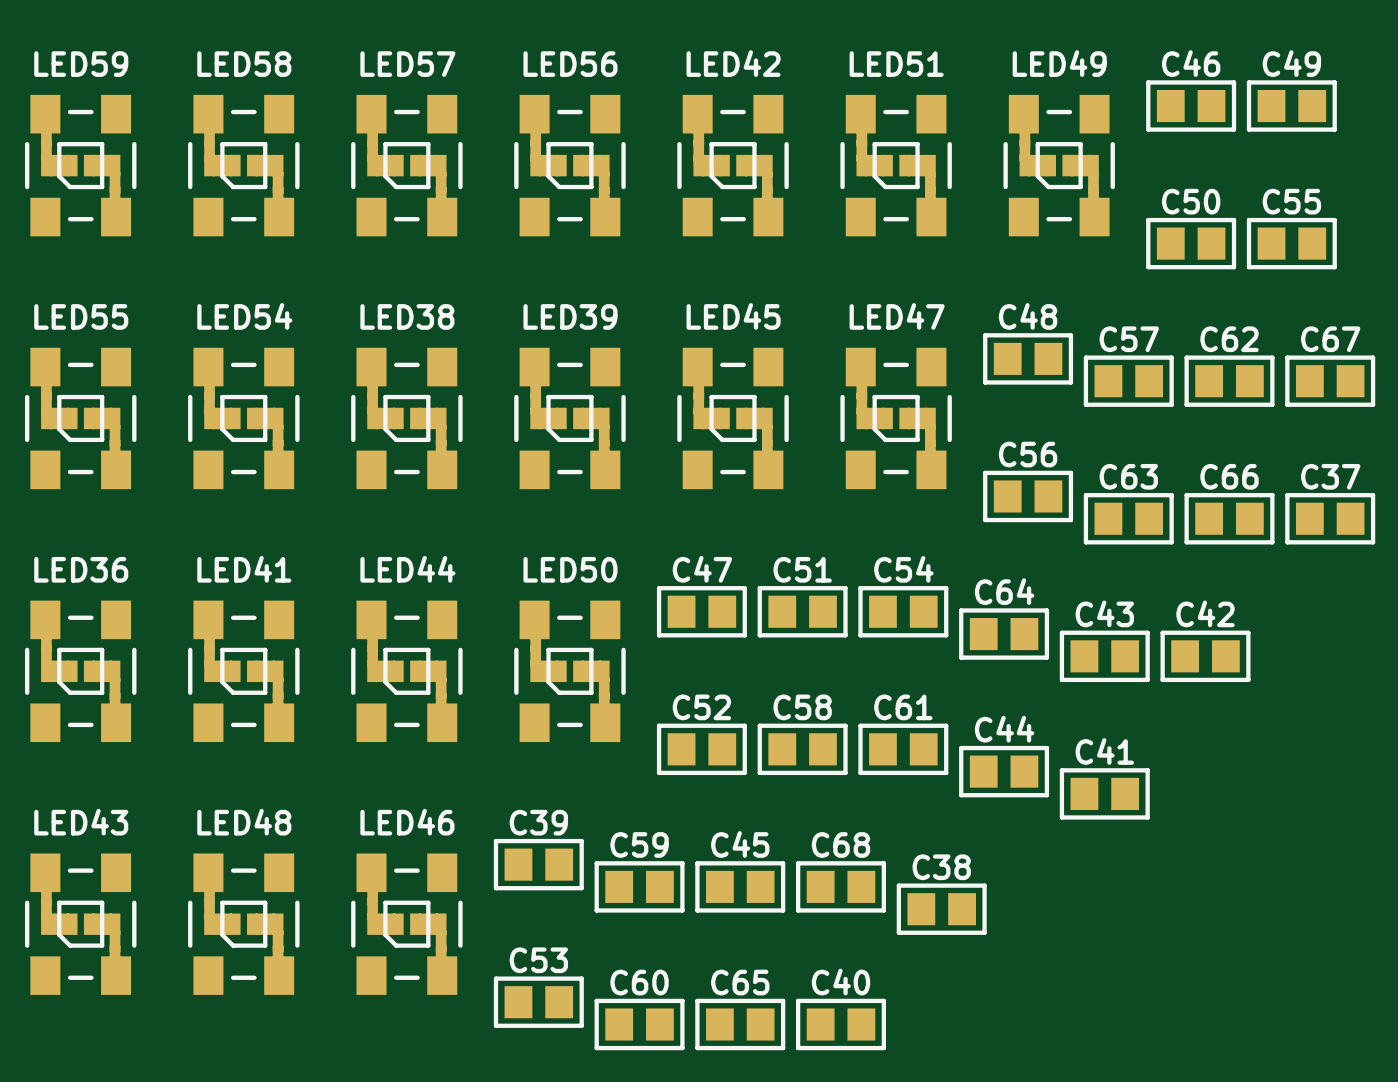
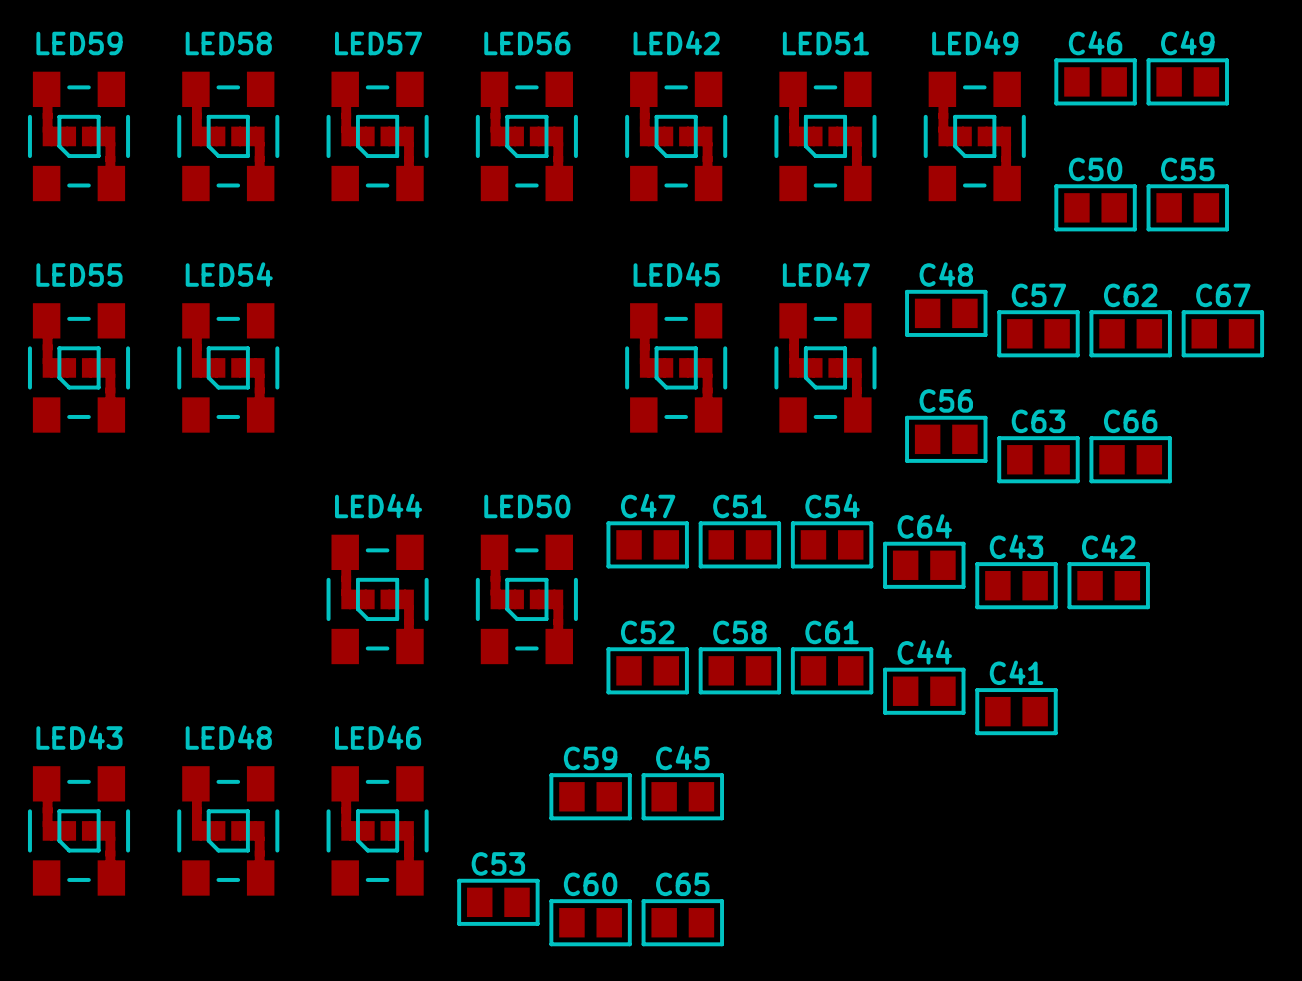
LED38: (406, 418) -> none
LED39: (569, 418) -> none
C37: (1330, 518) -> none
LED36: (80, 671) -> none
LED41: (243, 671) -> none
C39: (538, 864) -> none
C68: (840, 886) -> none
C38: (941, 909) -> none
C40: (840, 1024) -> none

